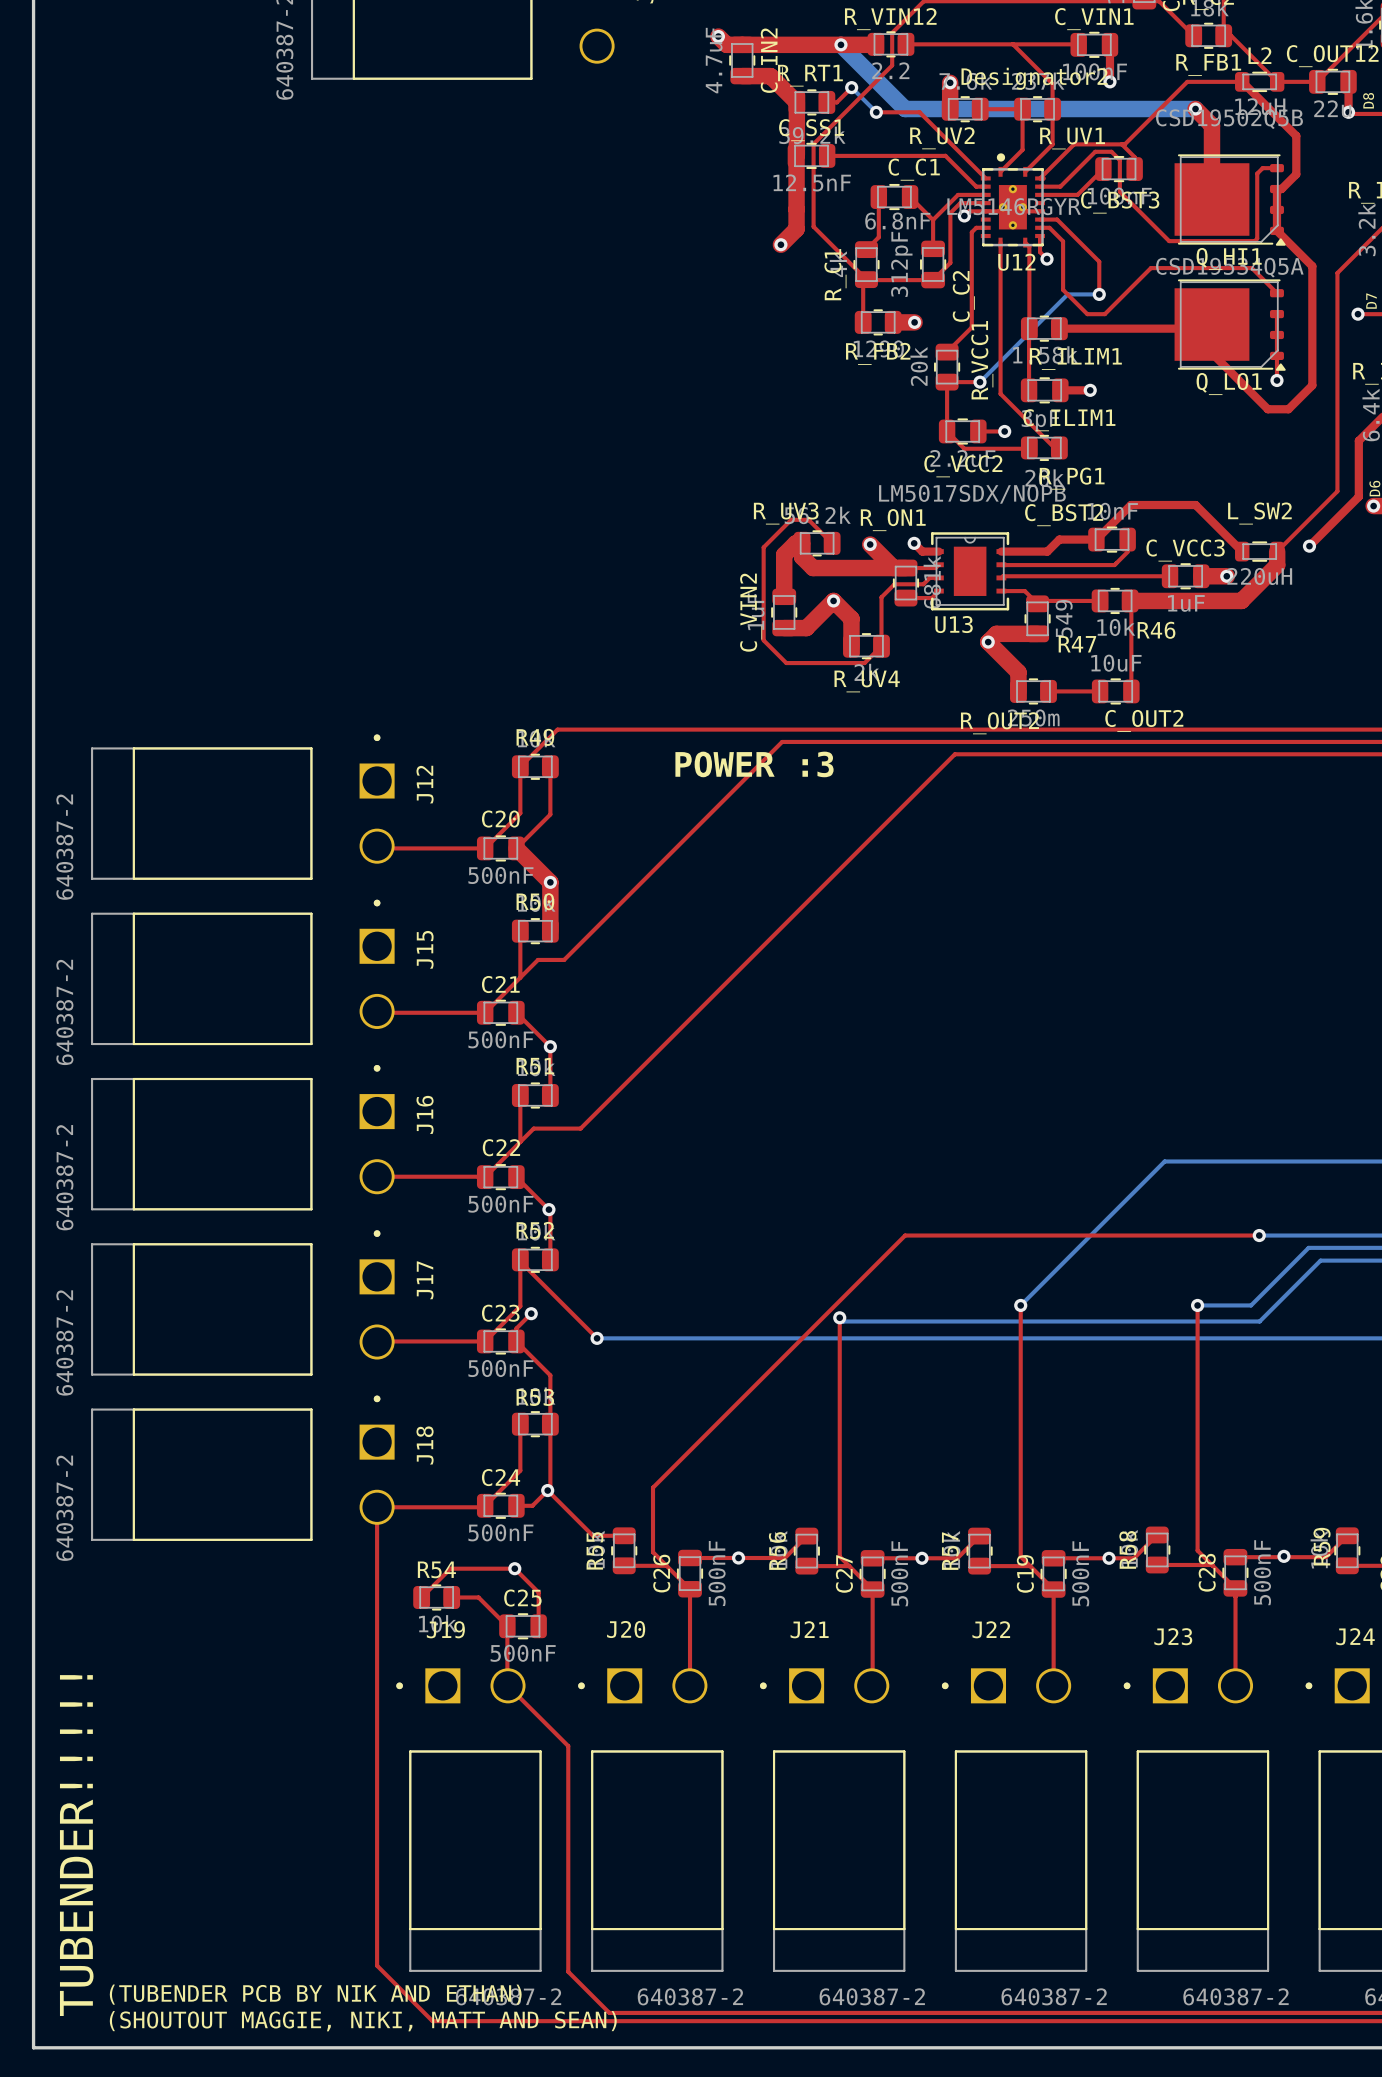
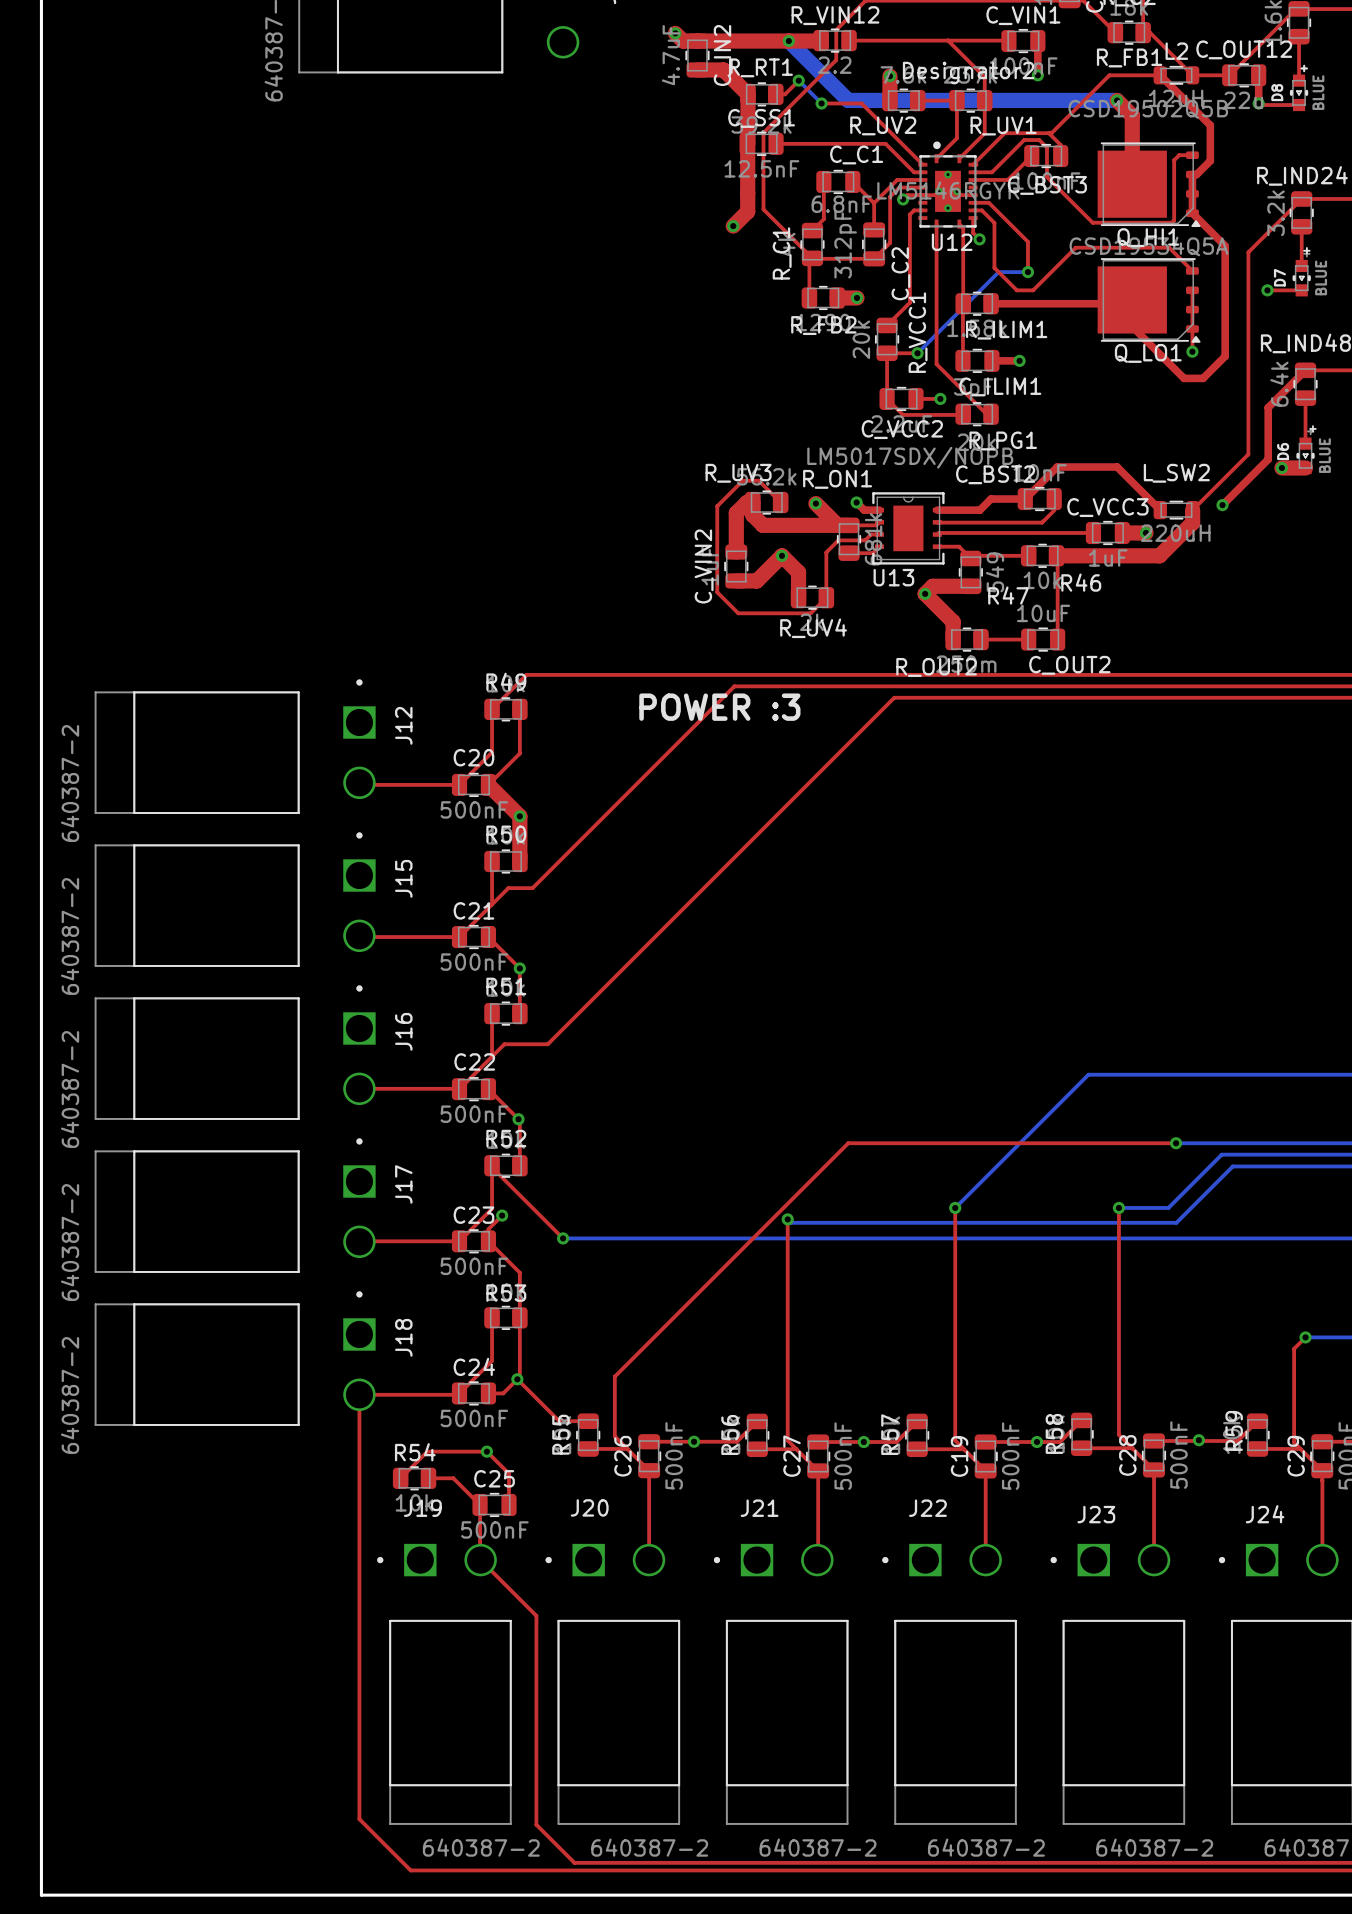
text: TUBENDER!!!!! (76, 1845) -> none
text: (TUBENDER PCB BY NIK AND ETHAN) (315, 1994) -> none
text: (SHOUTOUT MAGGIE, NIKI, MATT AND SEAN) (363, 2021) -> none

